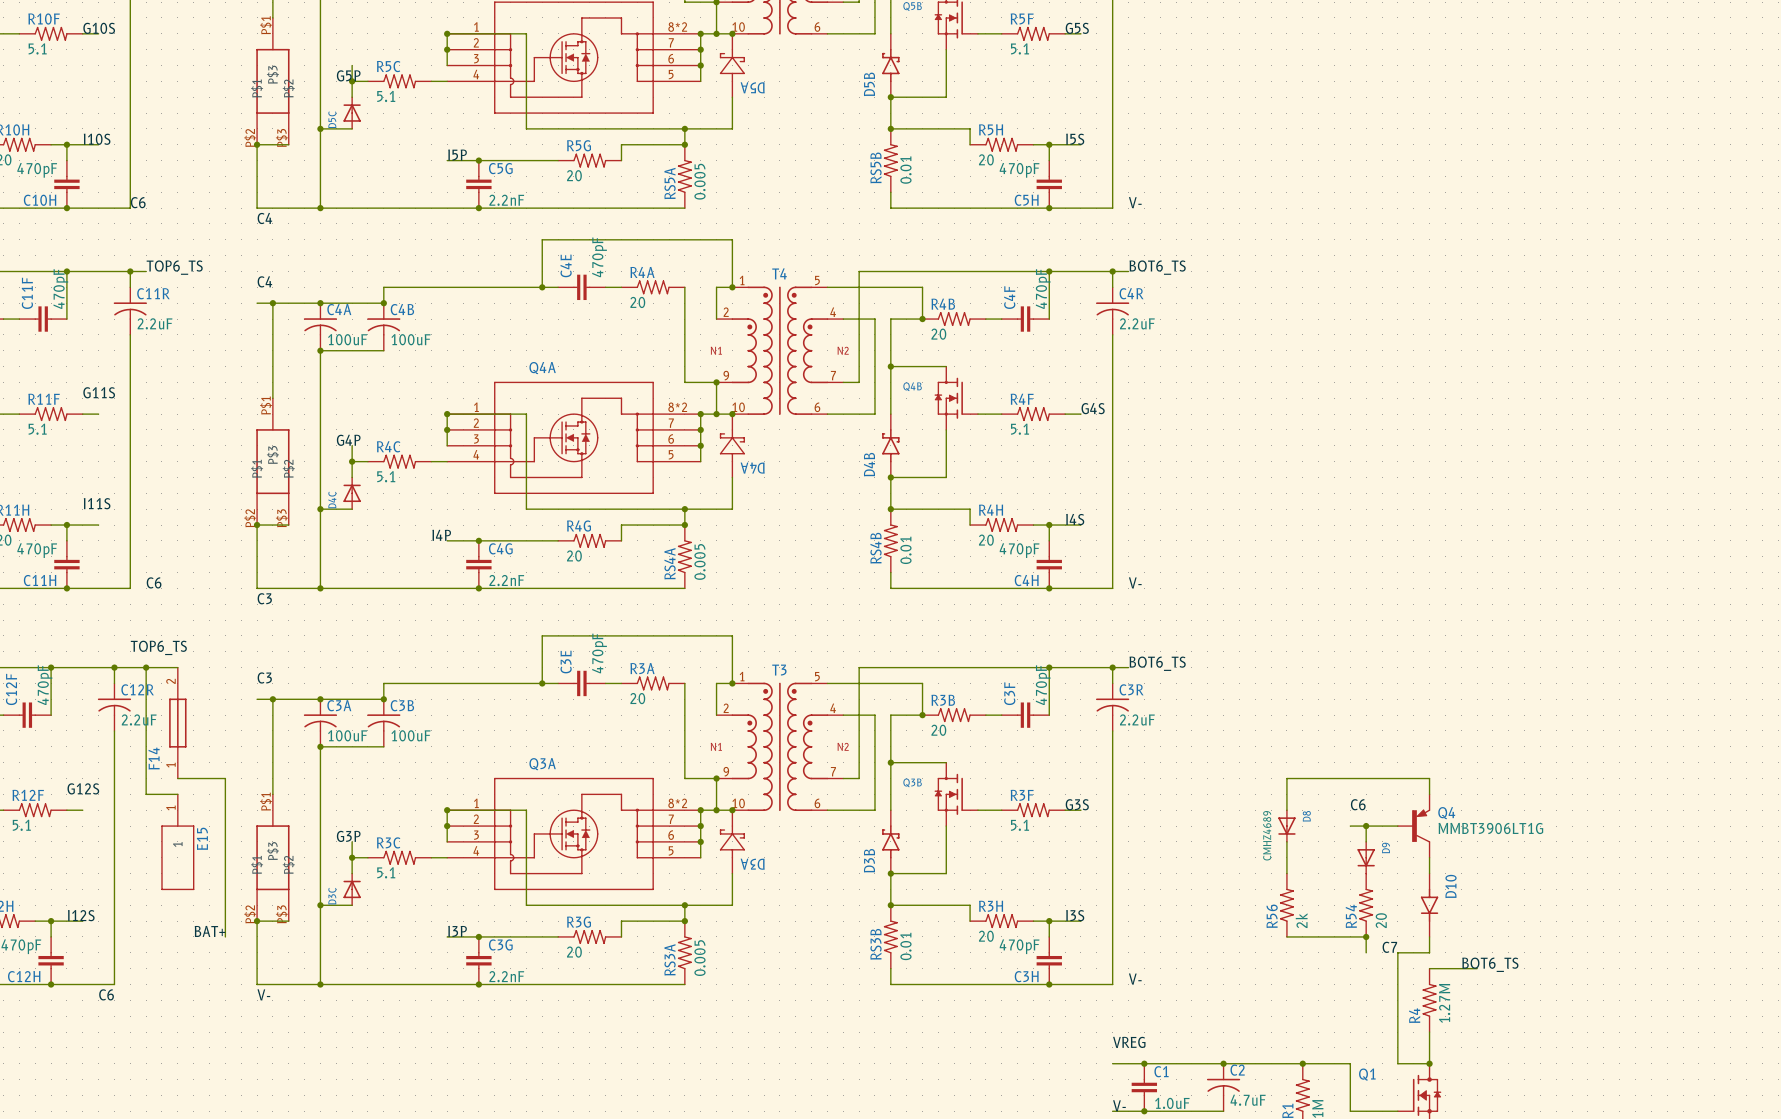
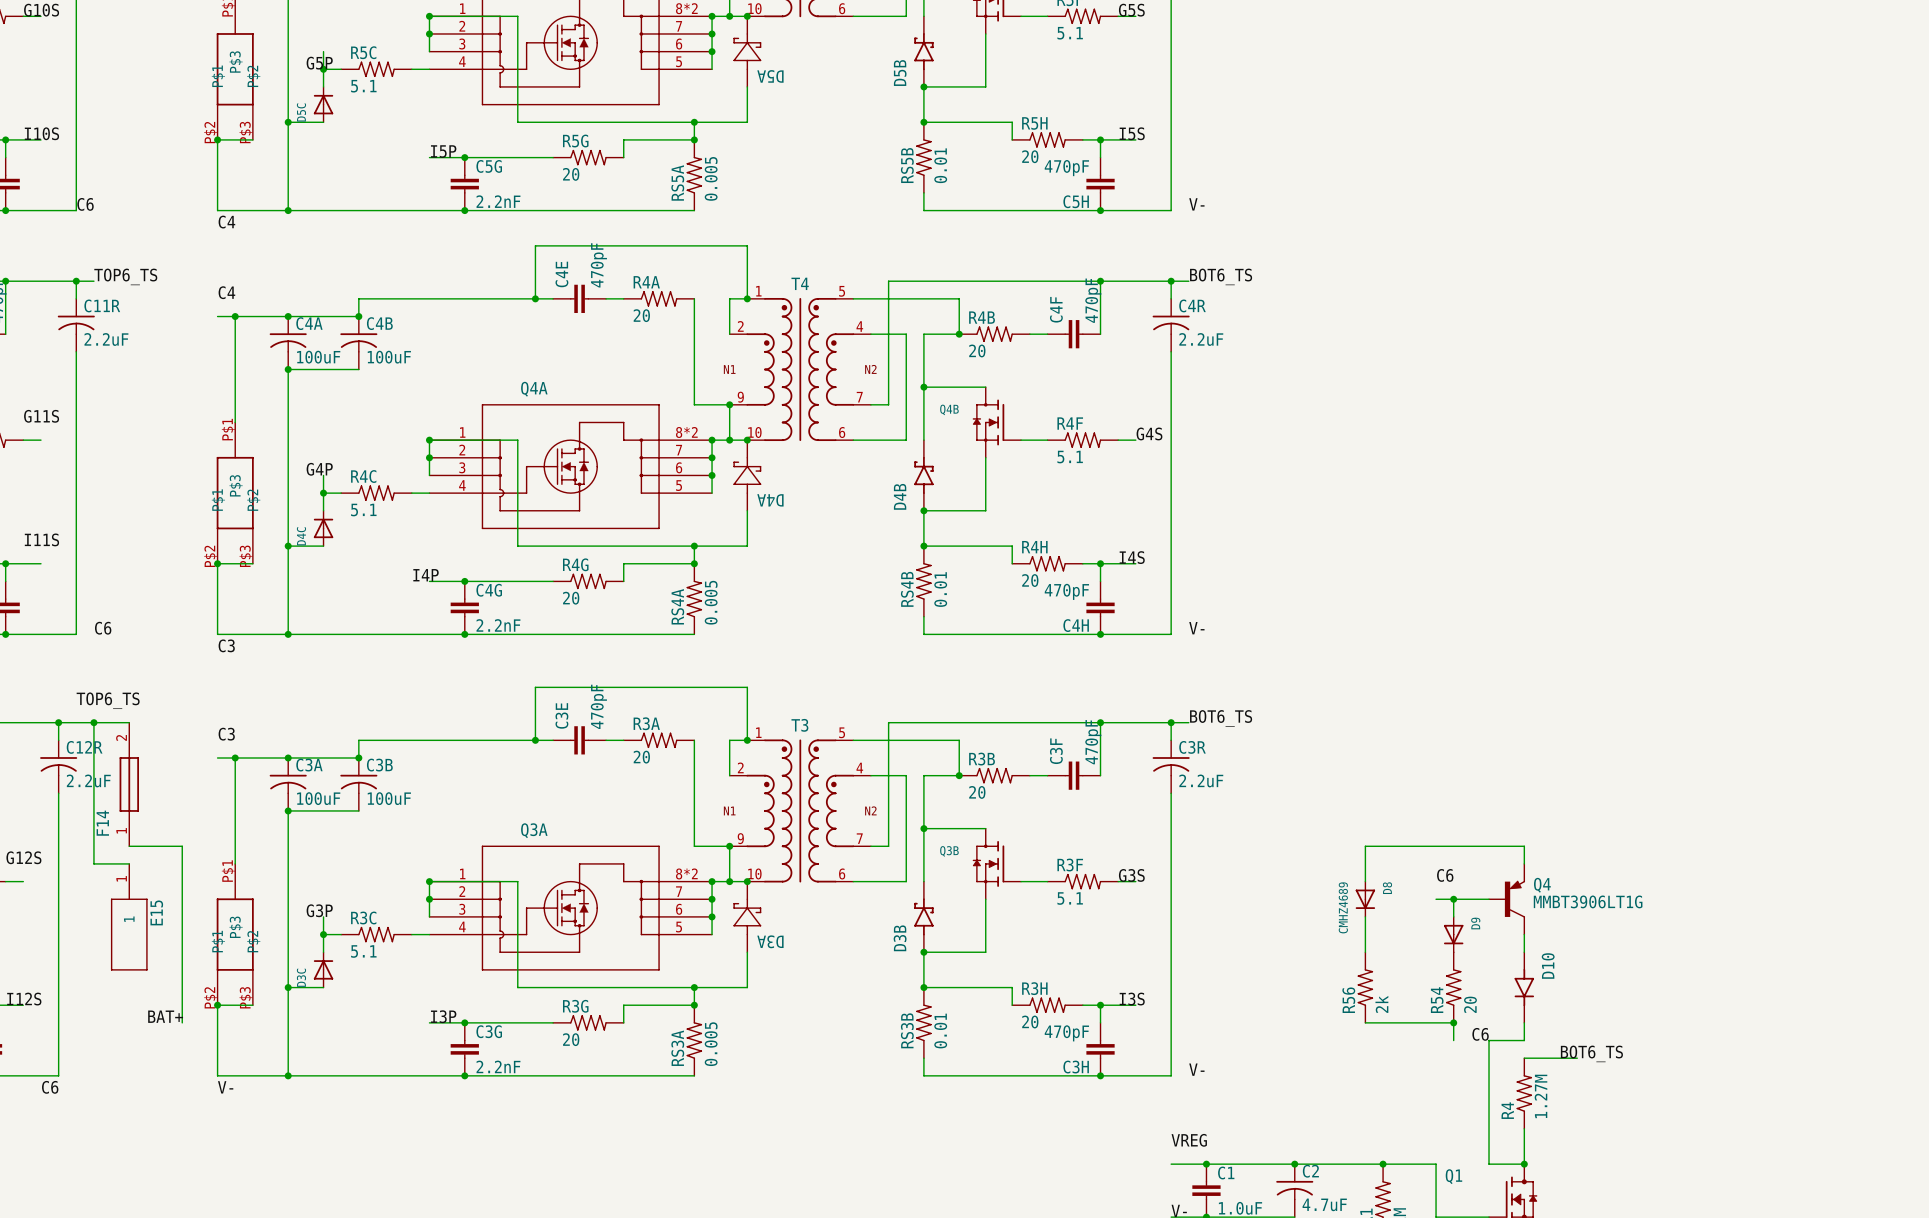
label: C7 (1389, 947) -> C6 (1480, 1034)

